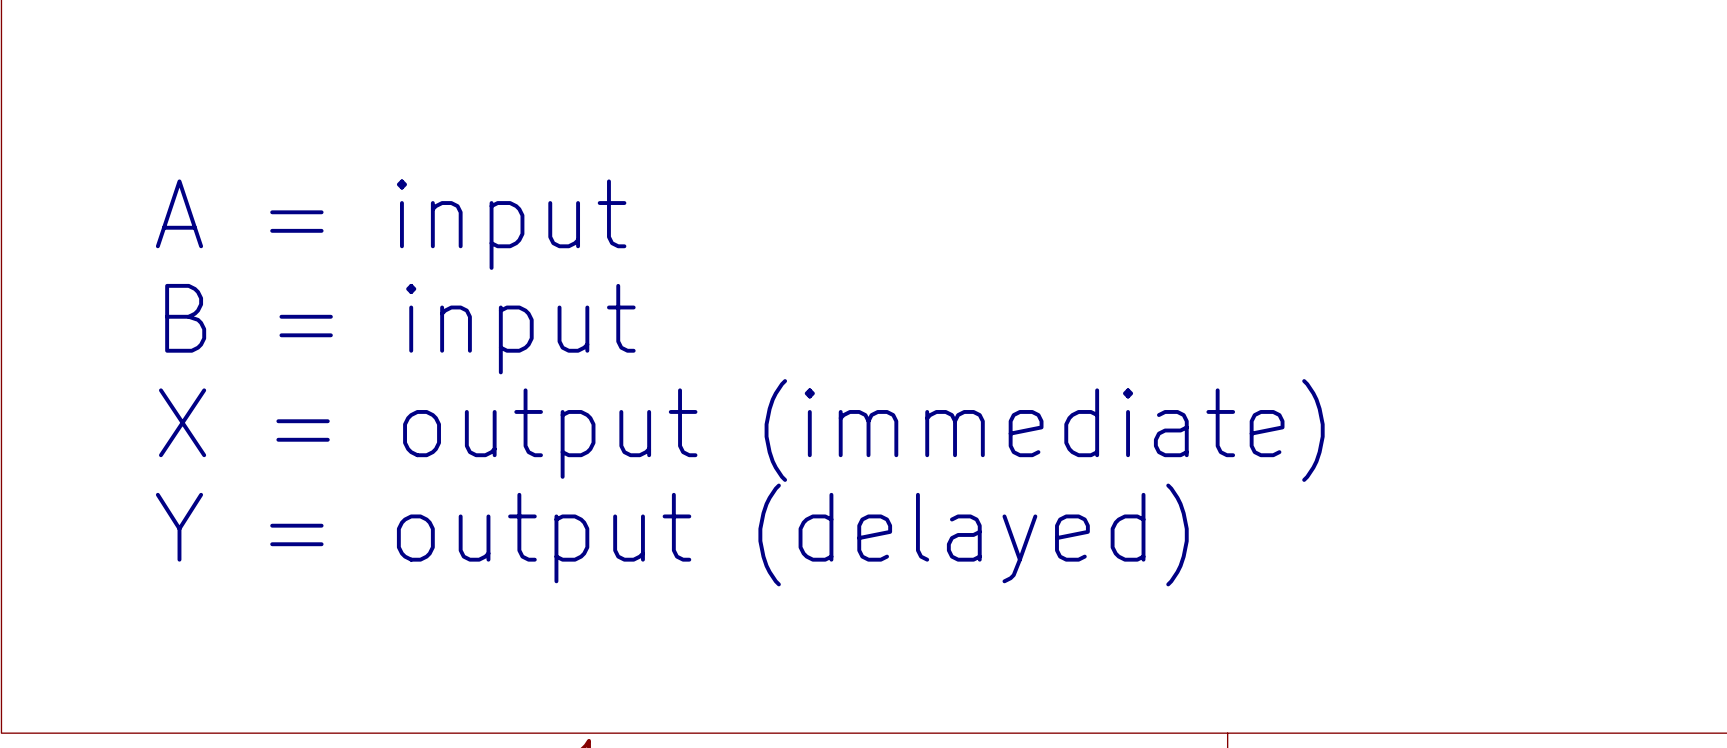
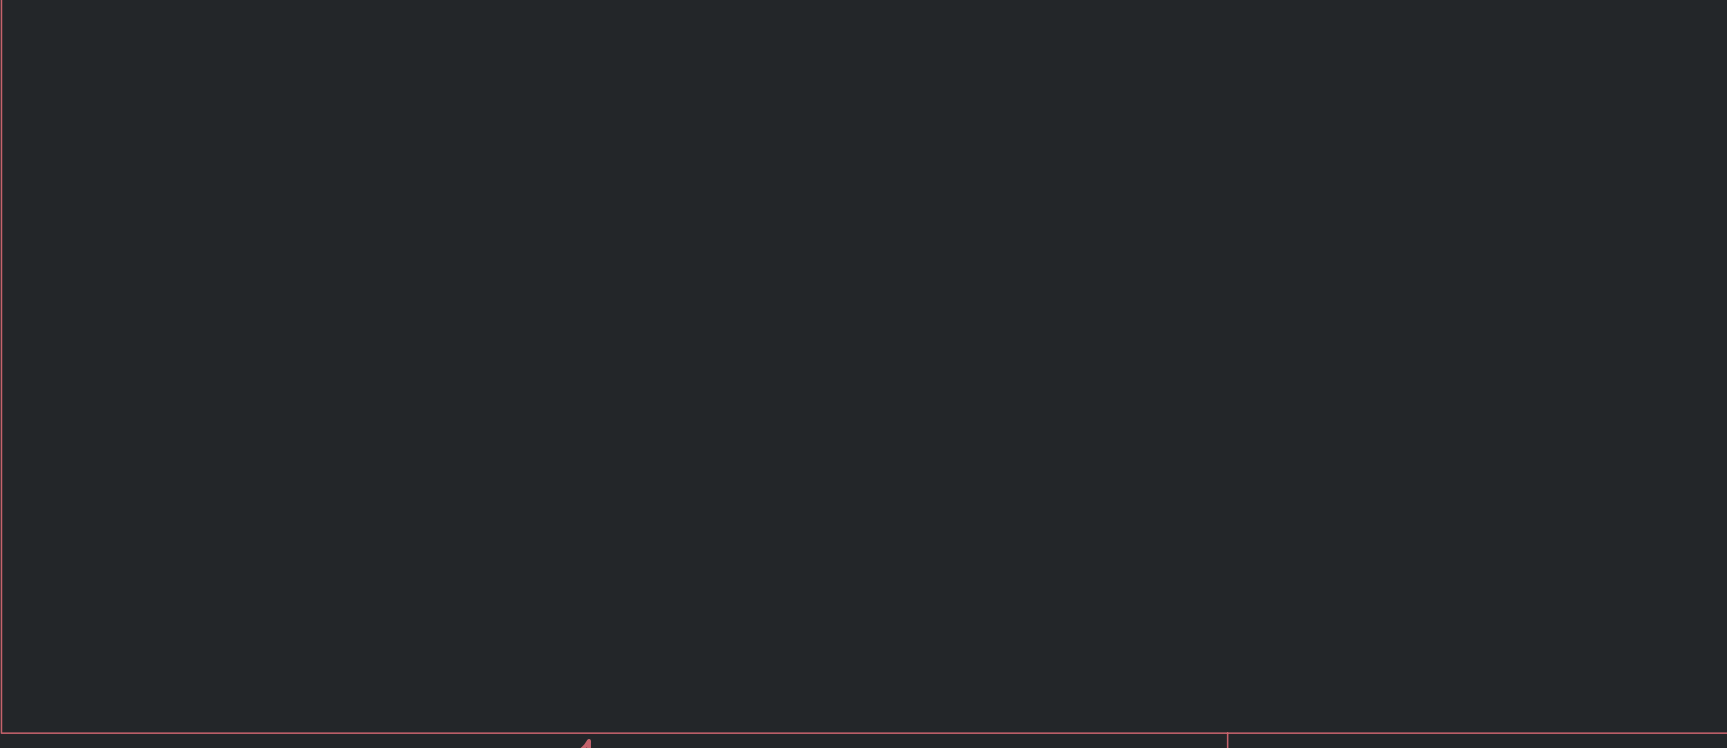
text: A = input (391, 224) -> none
text: B = input (400, 329) -> none
text: X = output (immediate) (741, 430) -> none
text: Y = output (delayed) (672, 534) -> none

